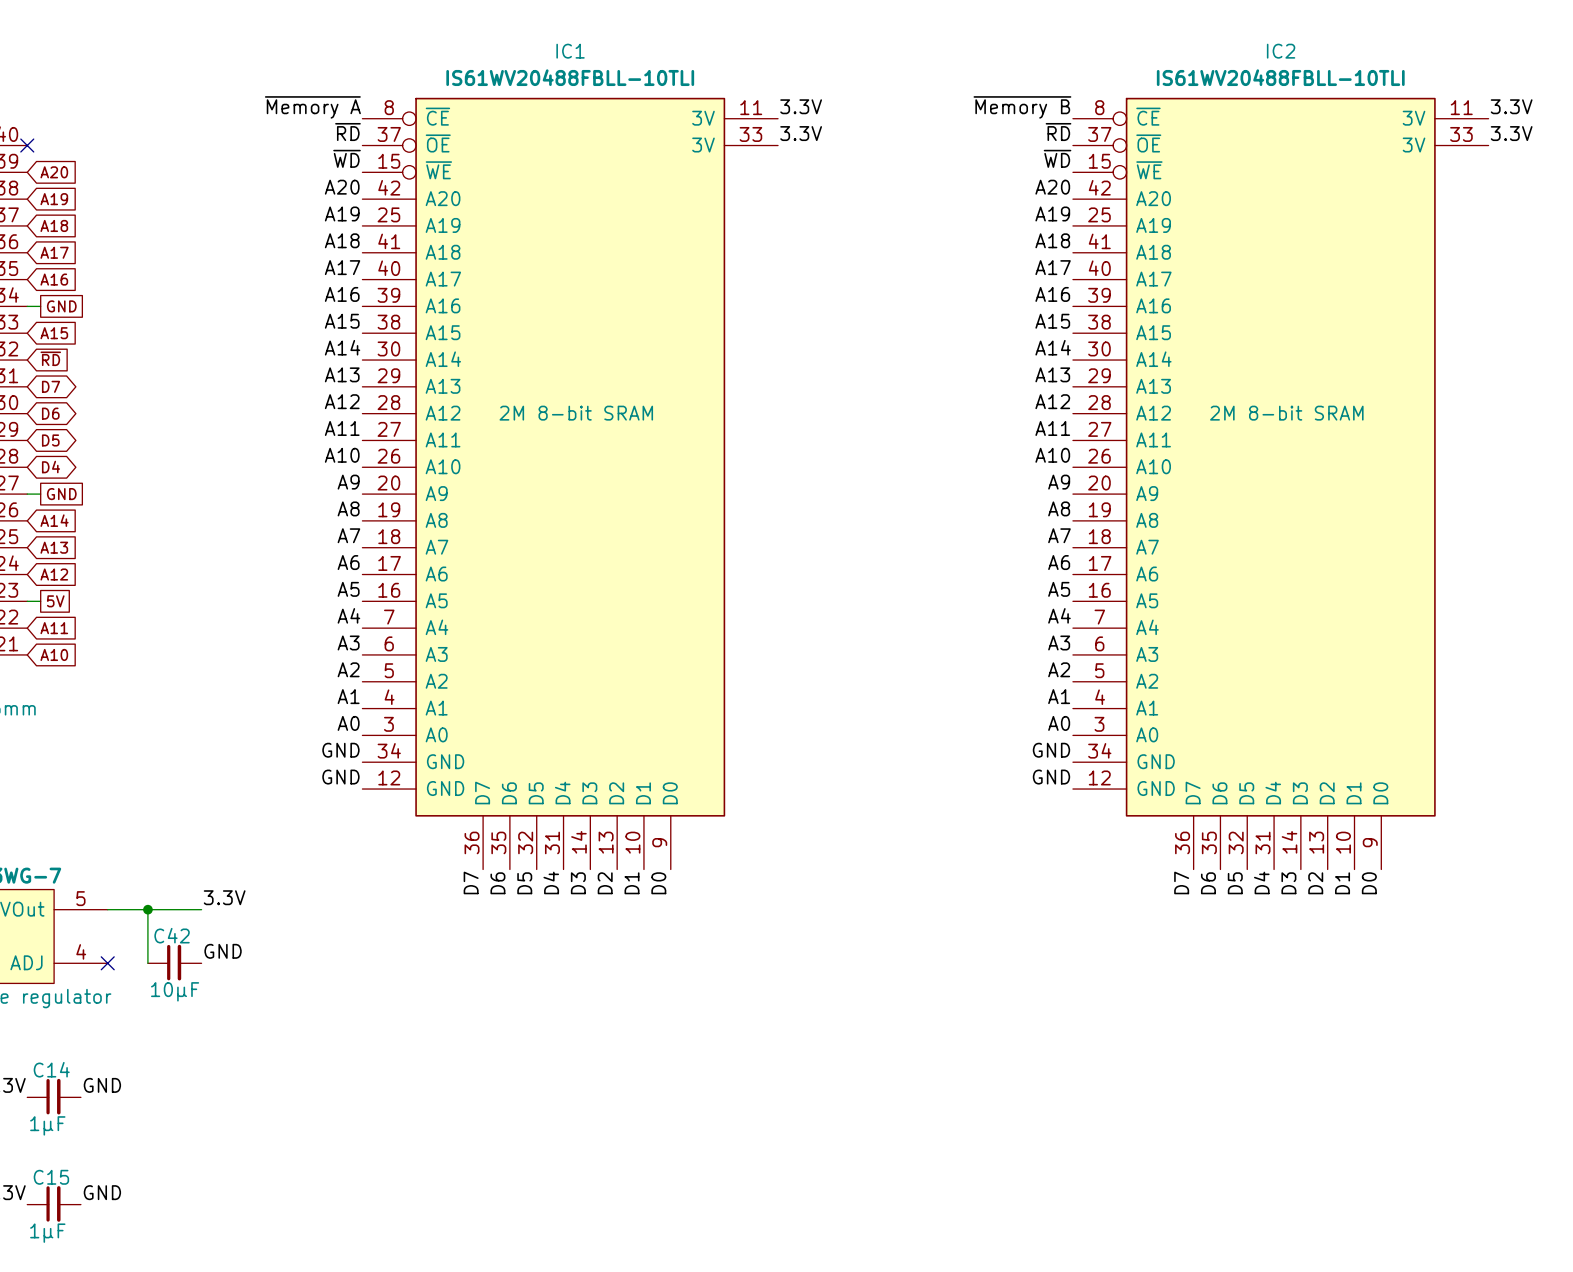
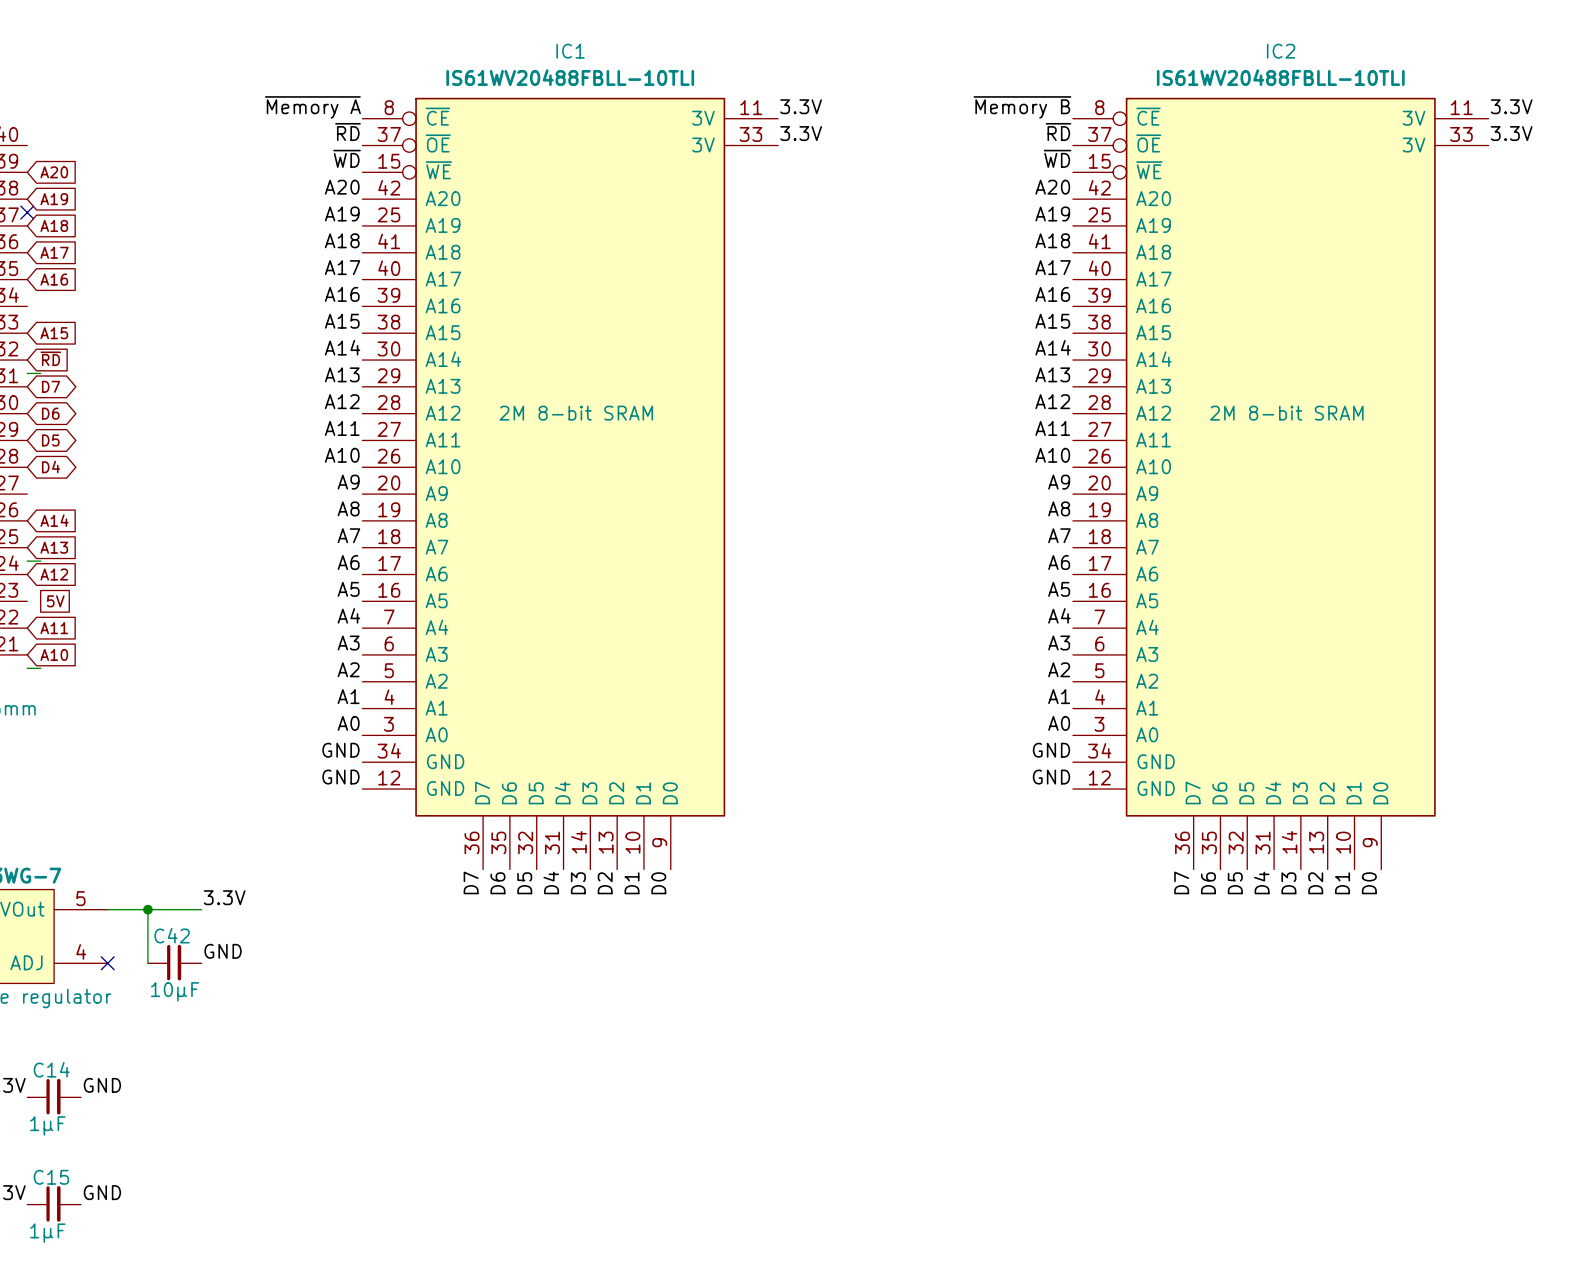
no-connect mark: (27, 145) -> none
no-connect mark: none -> (27, 212)
wire: (27, 306) (40, 306) -> (27, 373) (40, 373)
global label: GND (61, 306) -> none
wire: (27, 494) (40, 494) -> (27, 561) (40, 561)
global label: GND (61, 494) -> none
wire: (27, 601) (40, 601) -> (27, 668) (40, 668)

